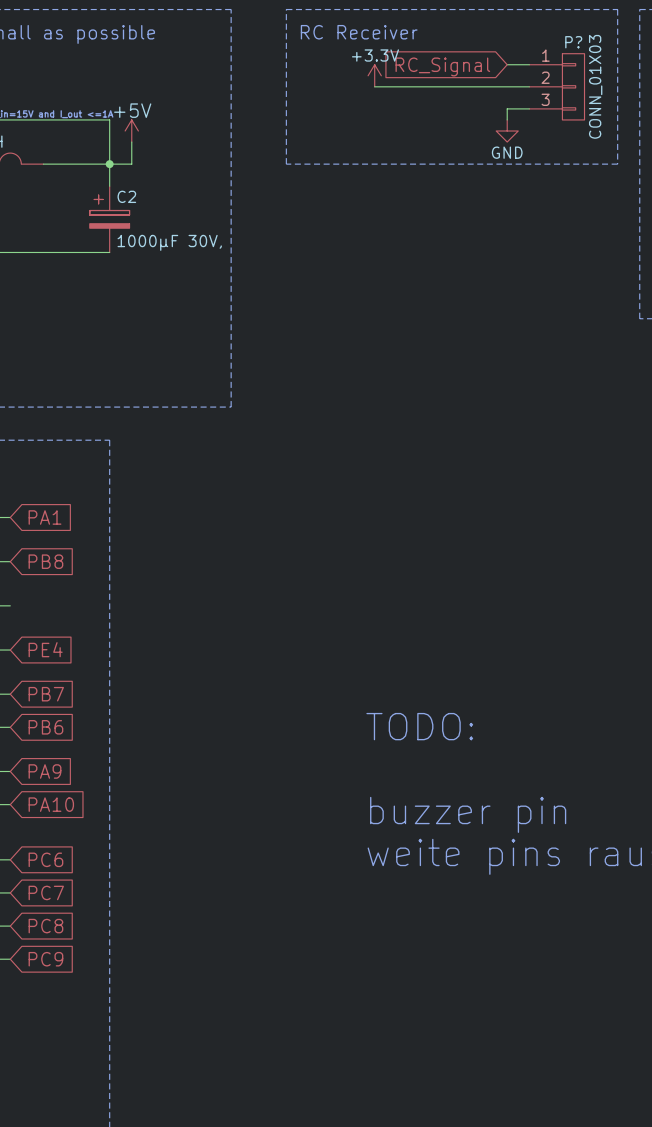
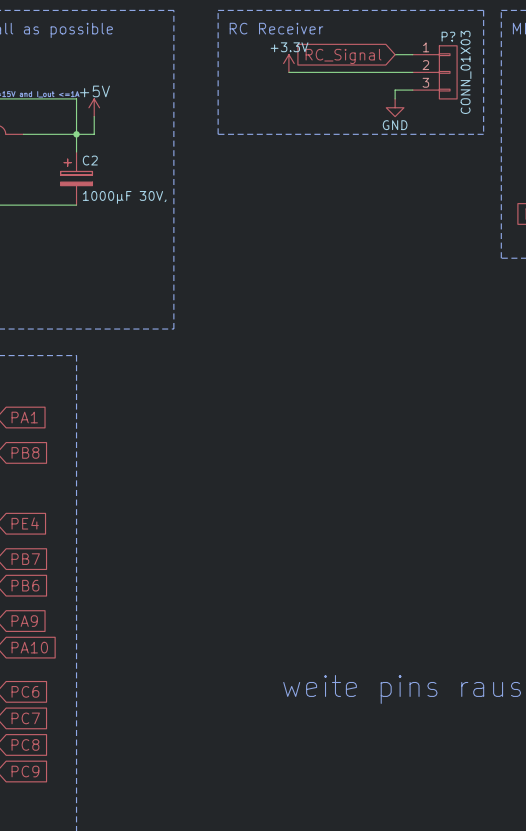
text: TODO: (419, 726) -> none
text: buzzer pin (468, 814) -> none

